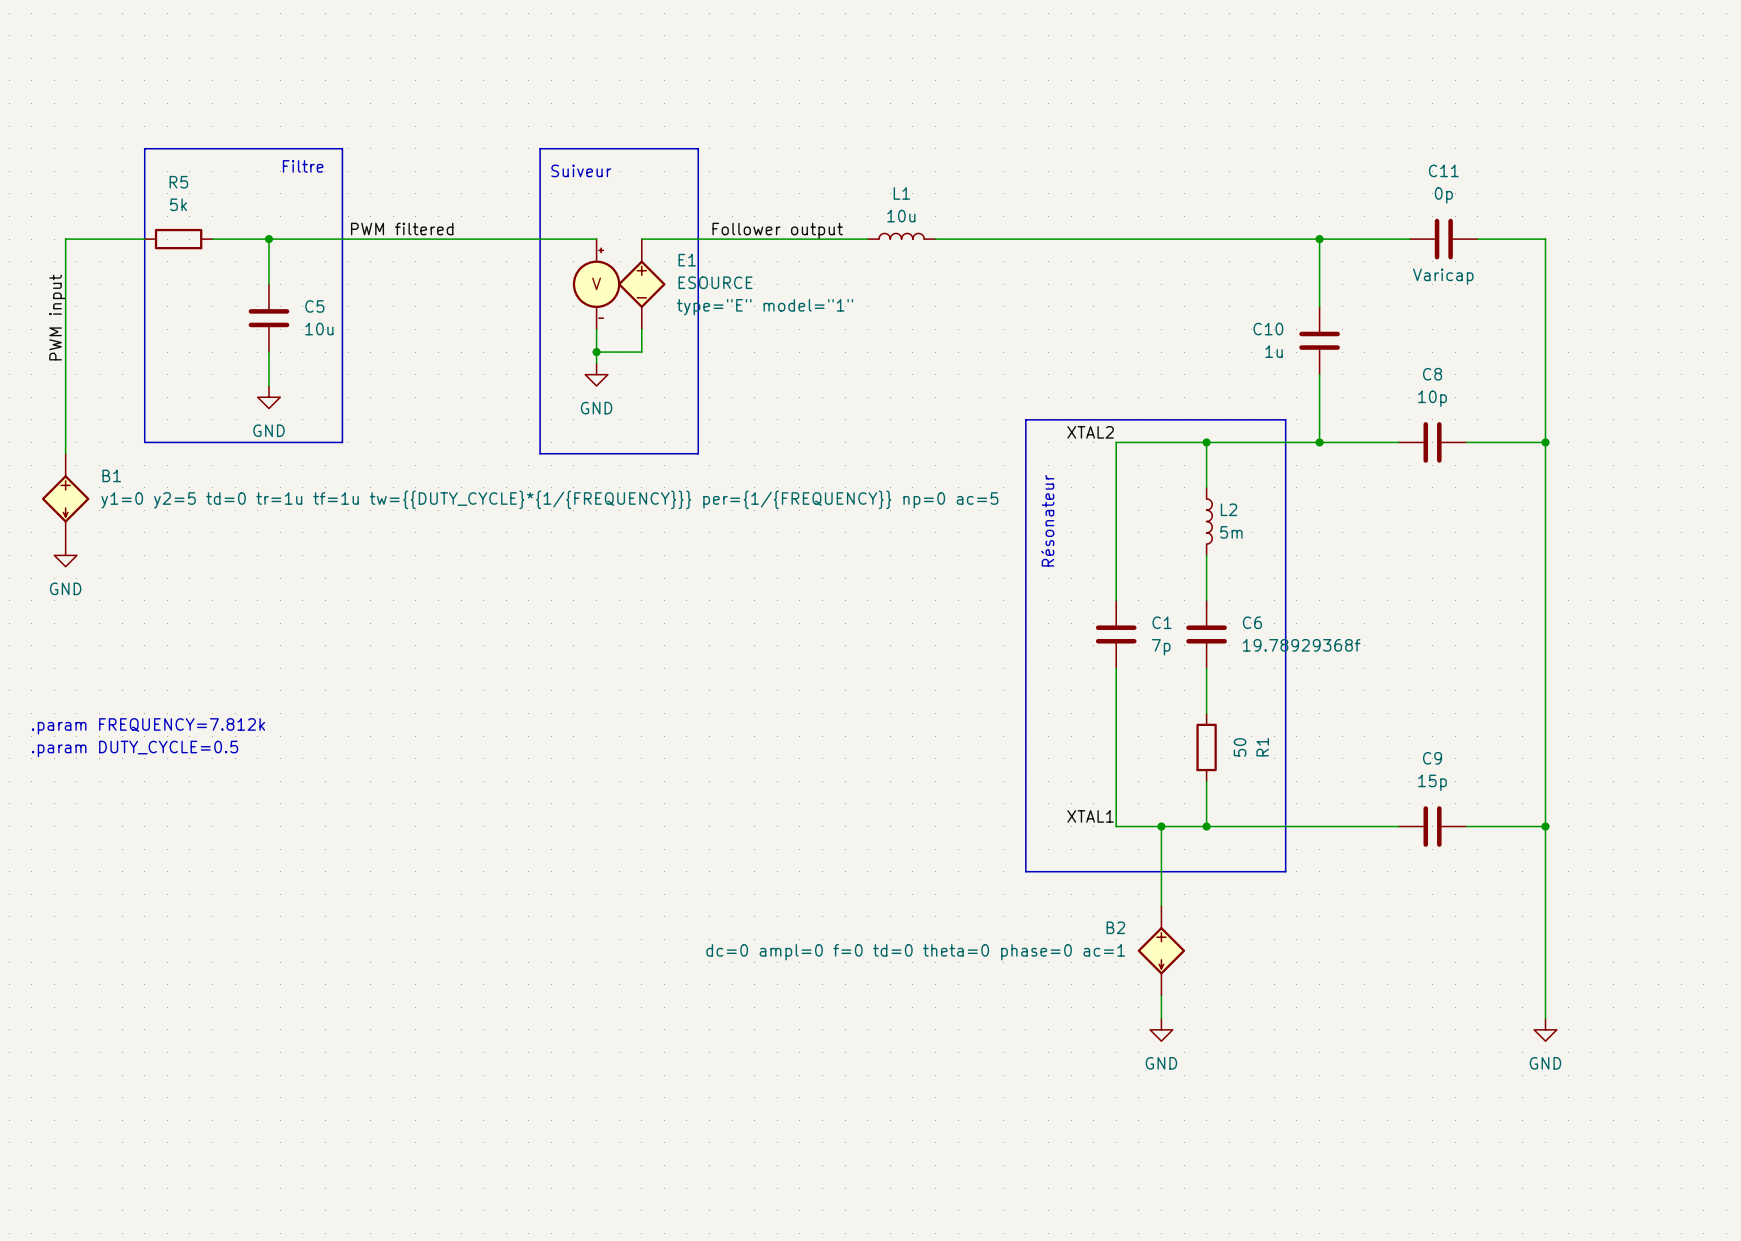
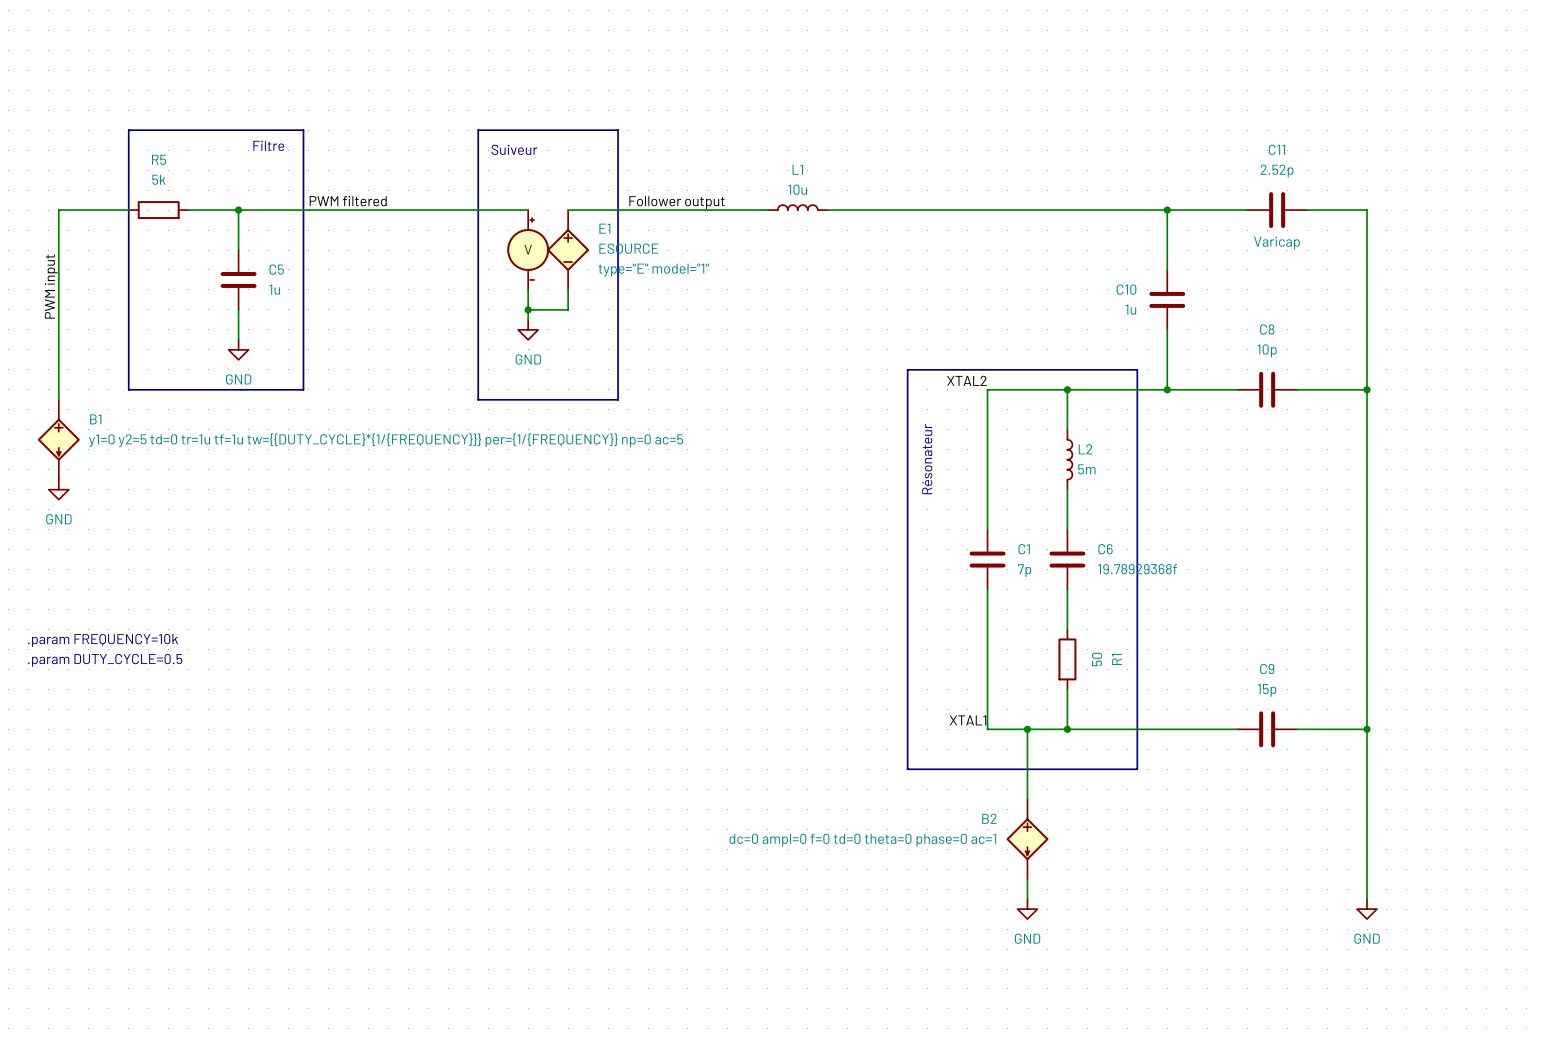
C11 value: 0p (1443, 195) -> 2.52p (1277, 171)
C5 value: 10u (319, 329) -> 1u (274, 289)
text: .param FREQUENCY=7.812k (148, 726) -> .param FREQUENCY=10k (103, 640)

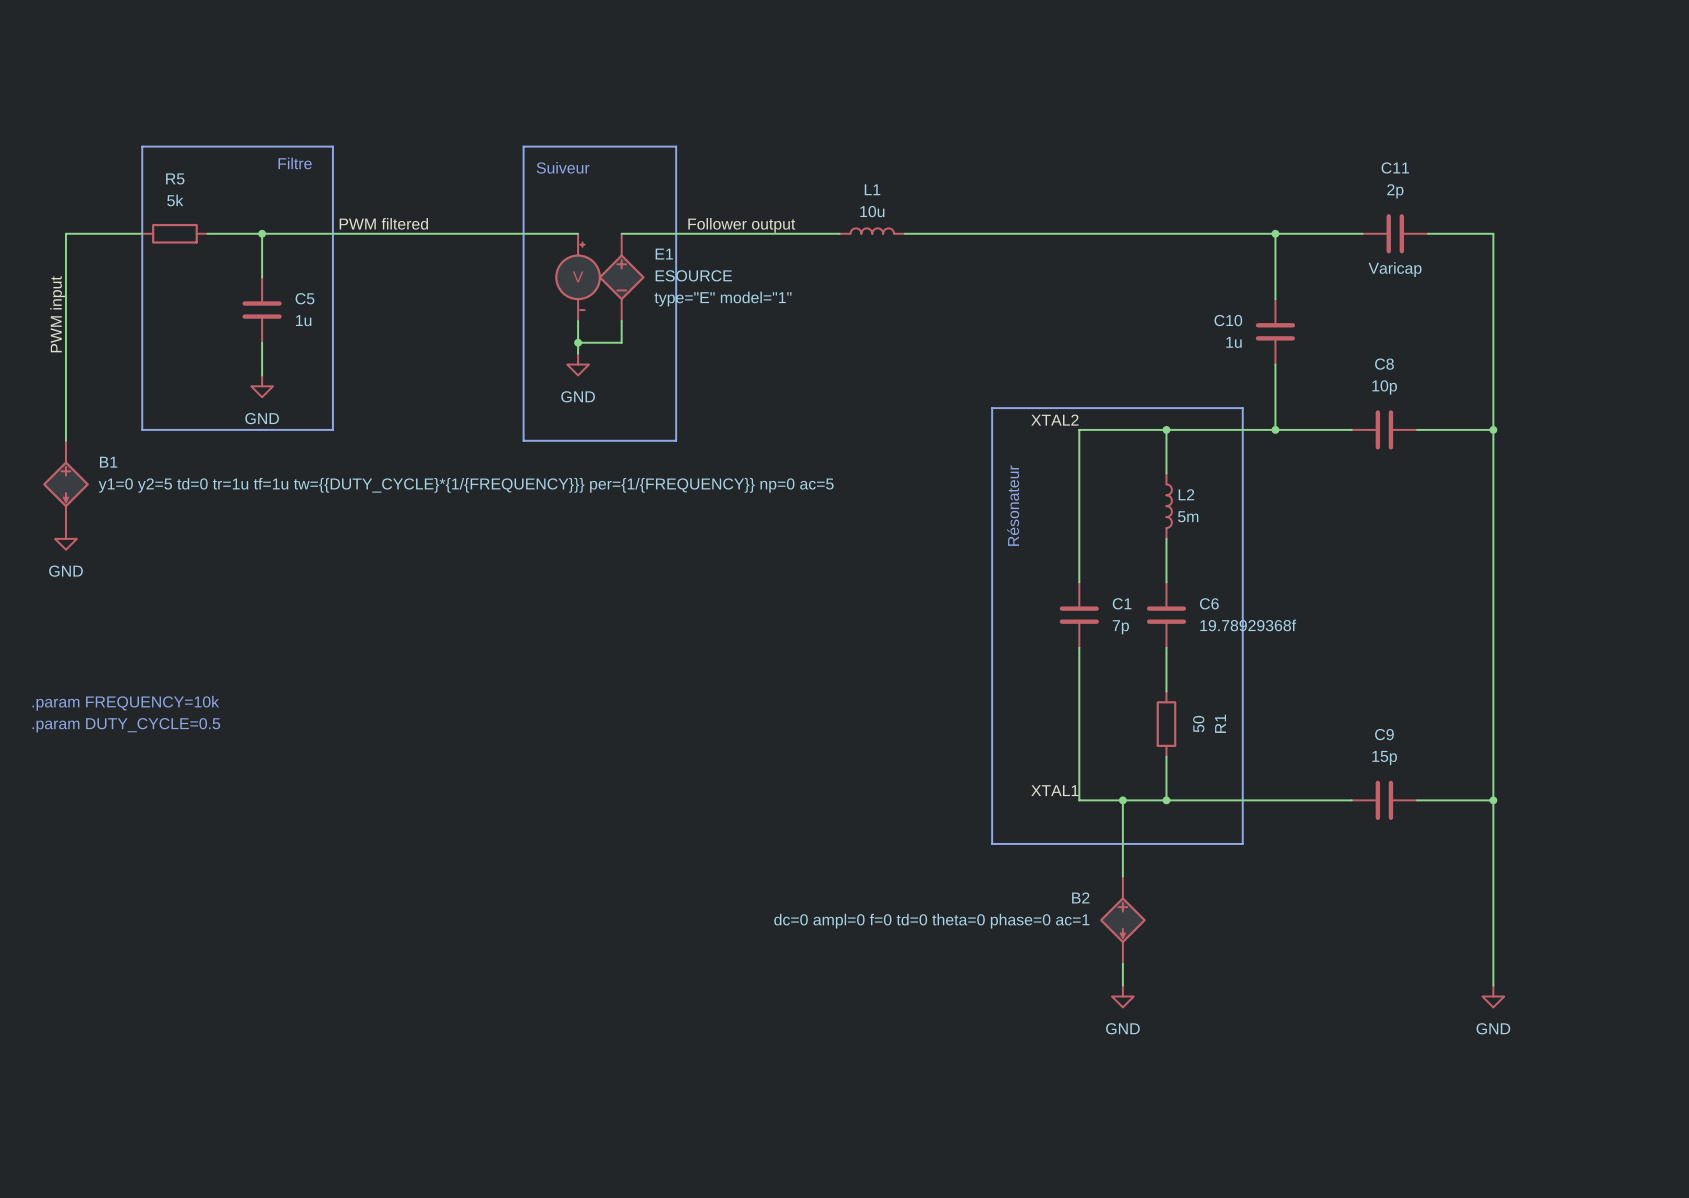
C11 value: 2.52p (1277, 171) -> 2p (1395, 191)

